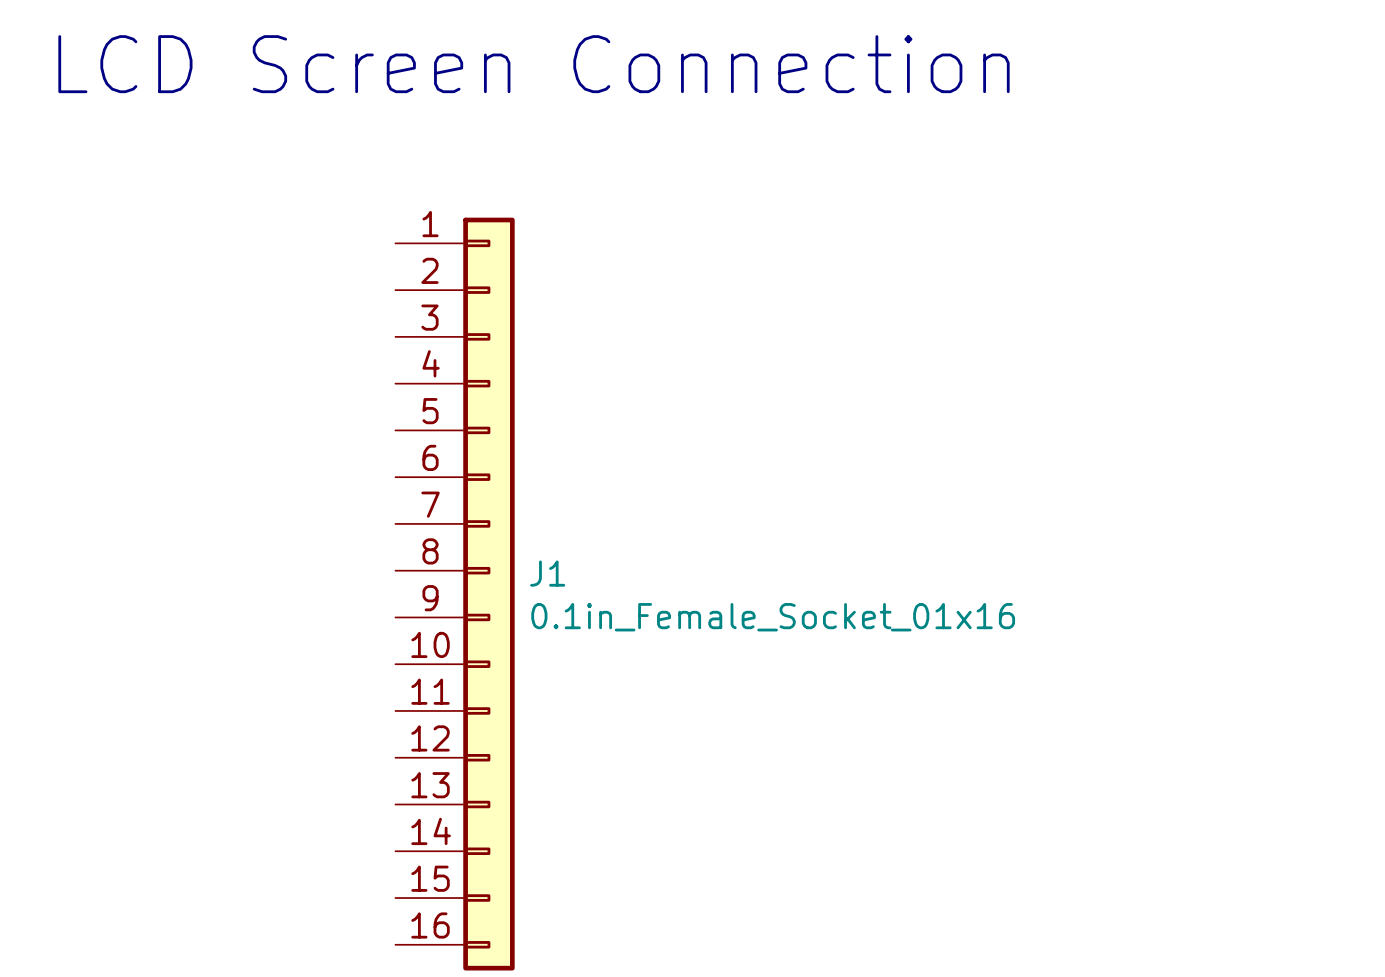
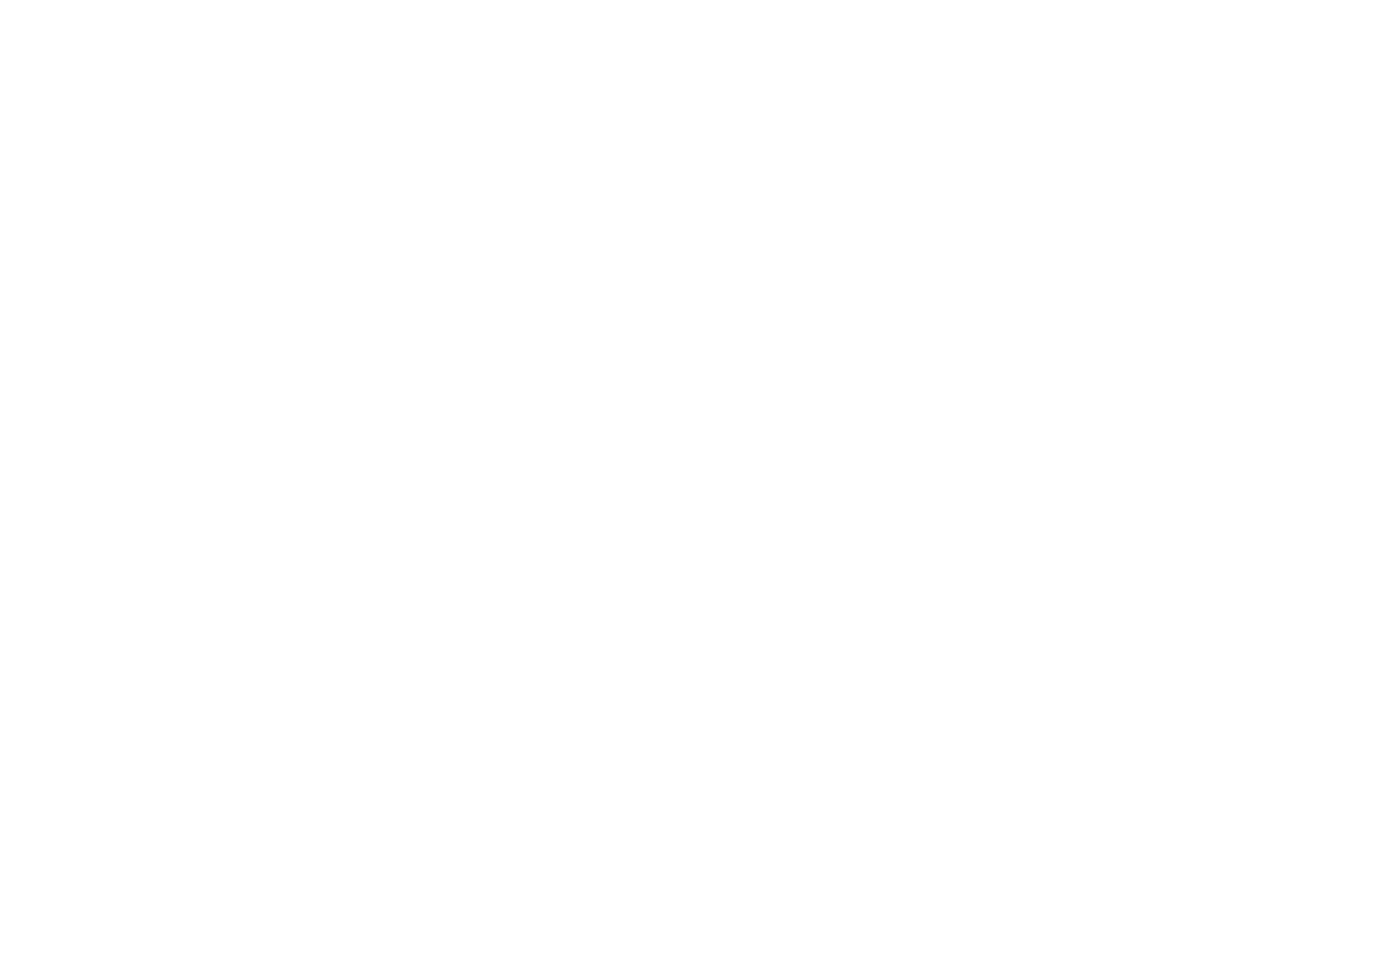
text: LCD Screen Connection (533, 64) -> none
J1: 0.1in_Female_Socket_01x16 (455, 594) -> none

